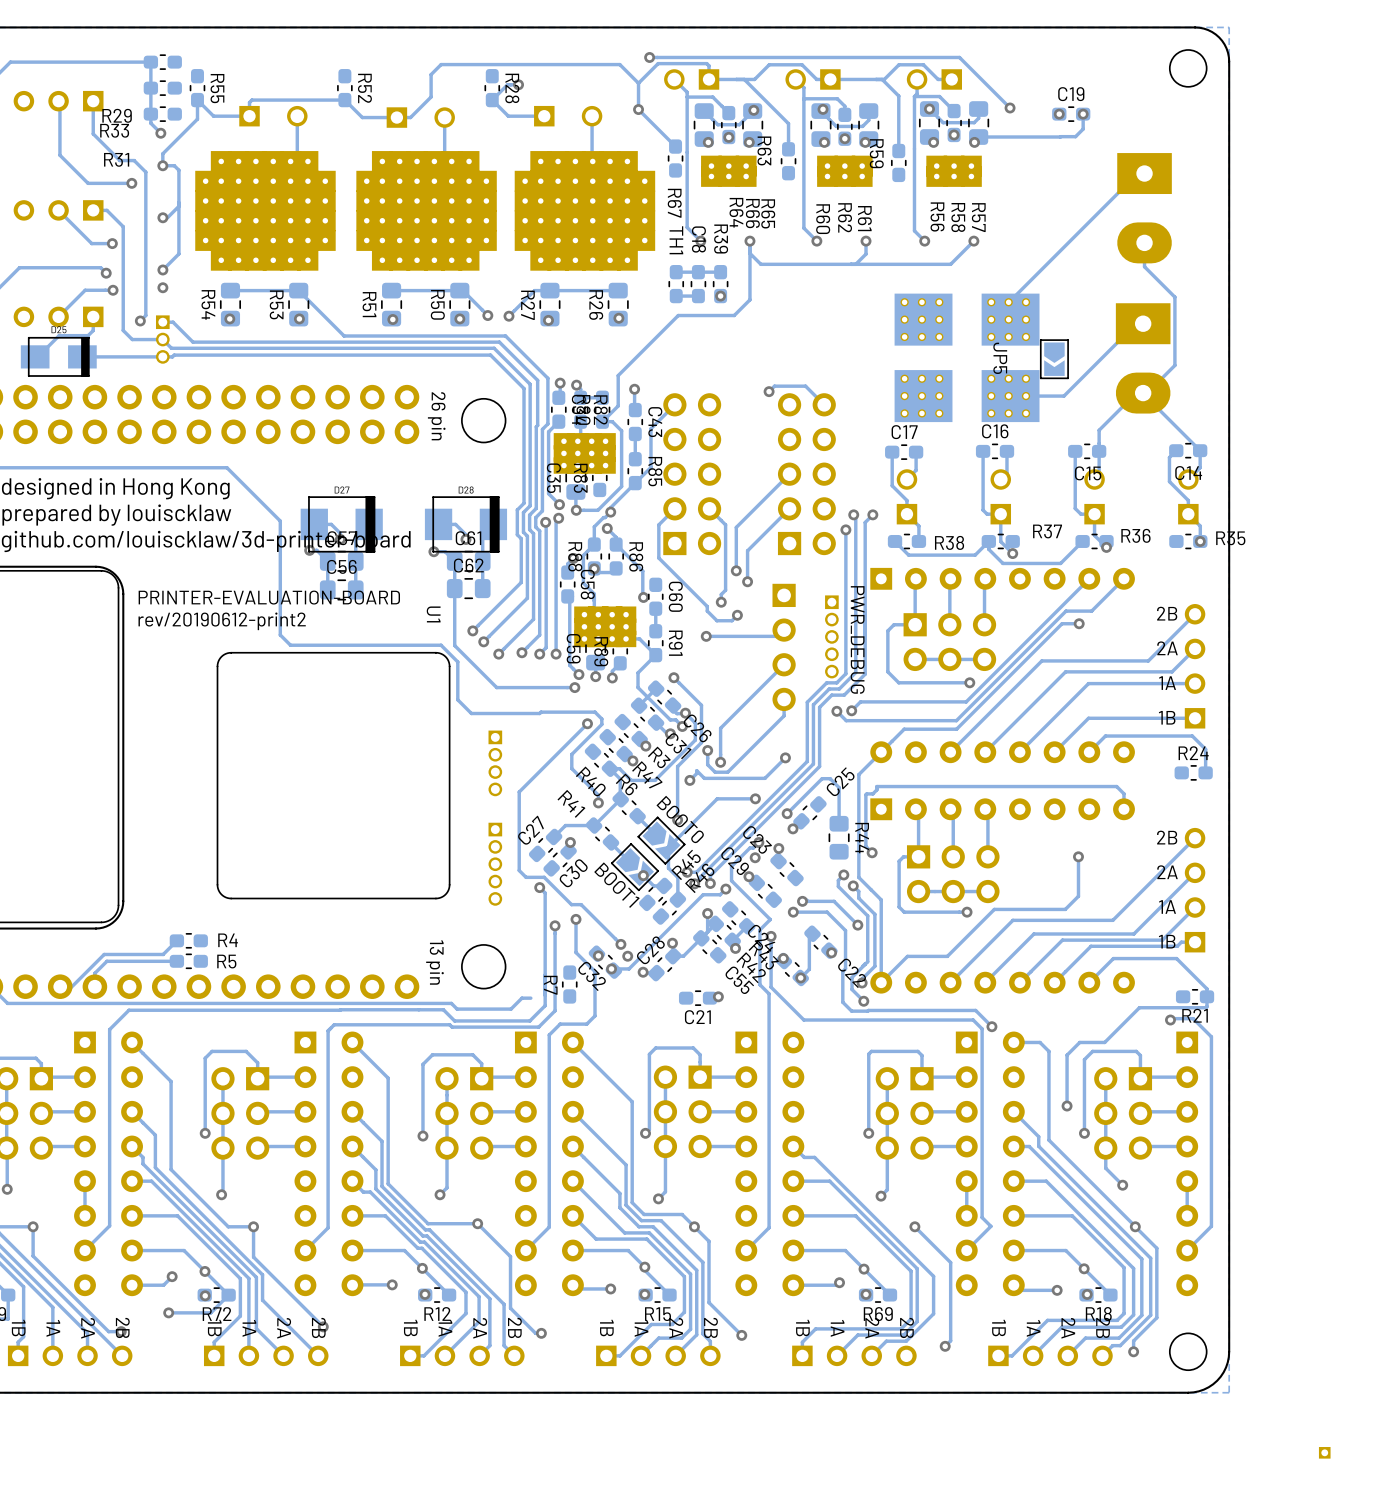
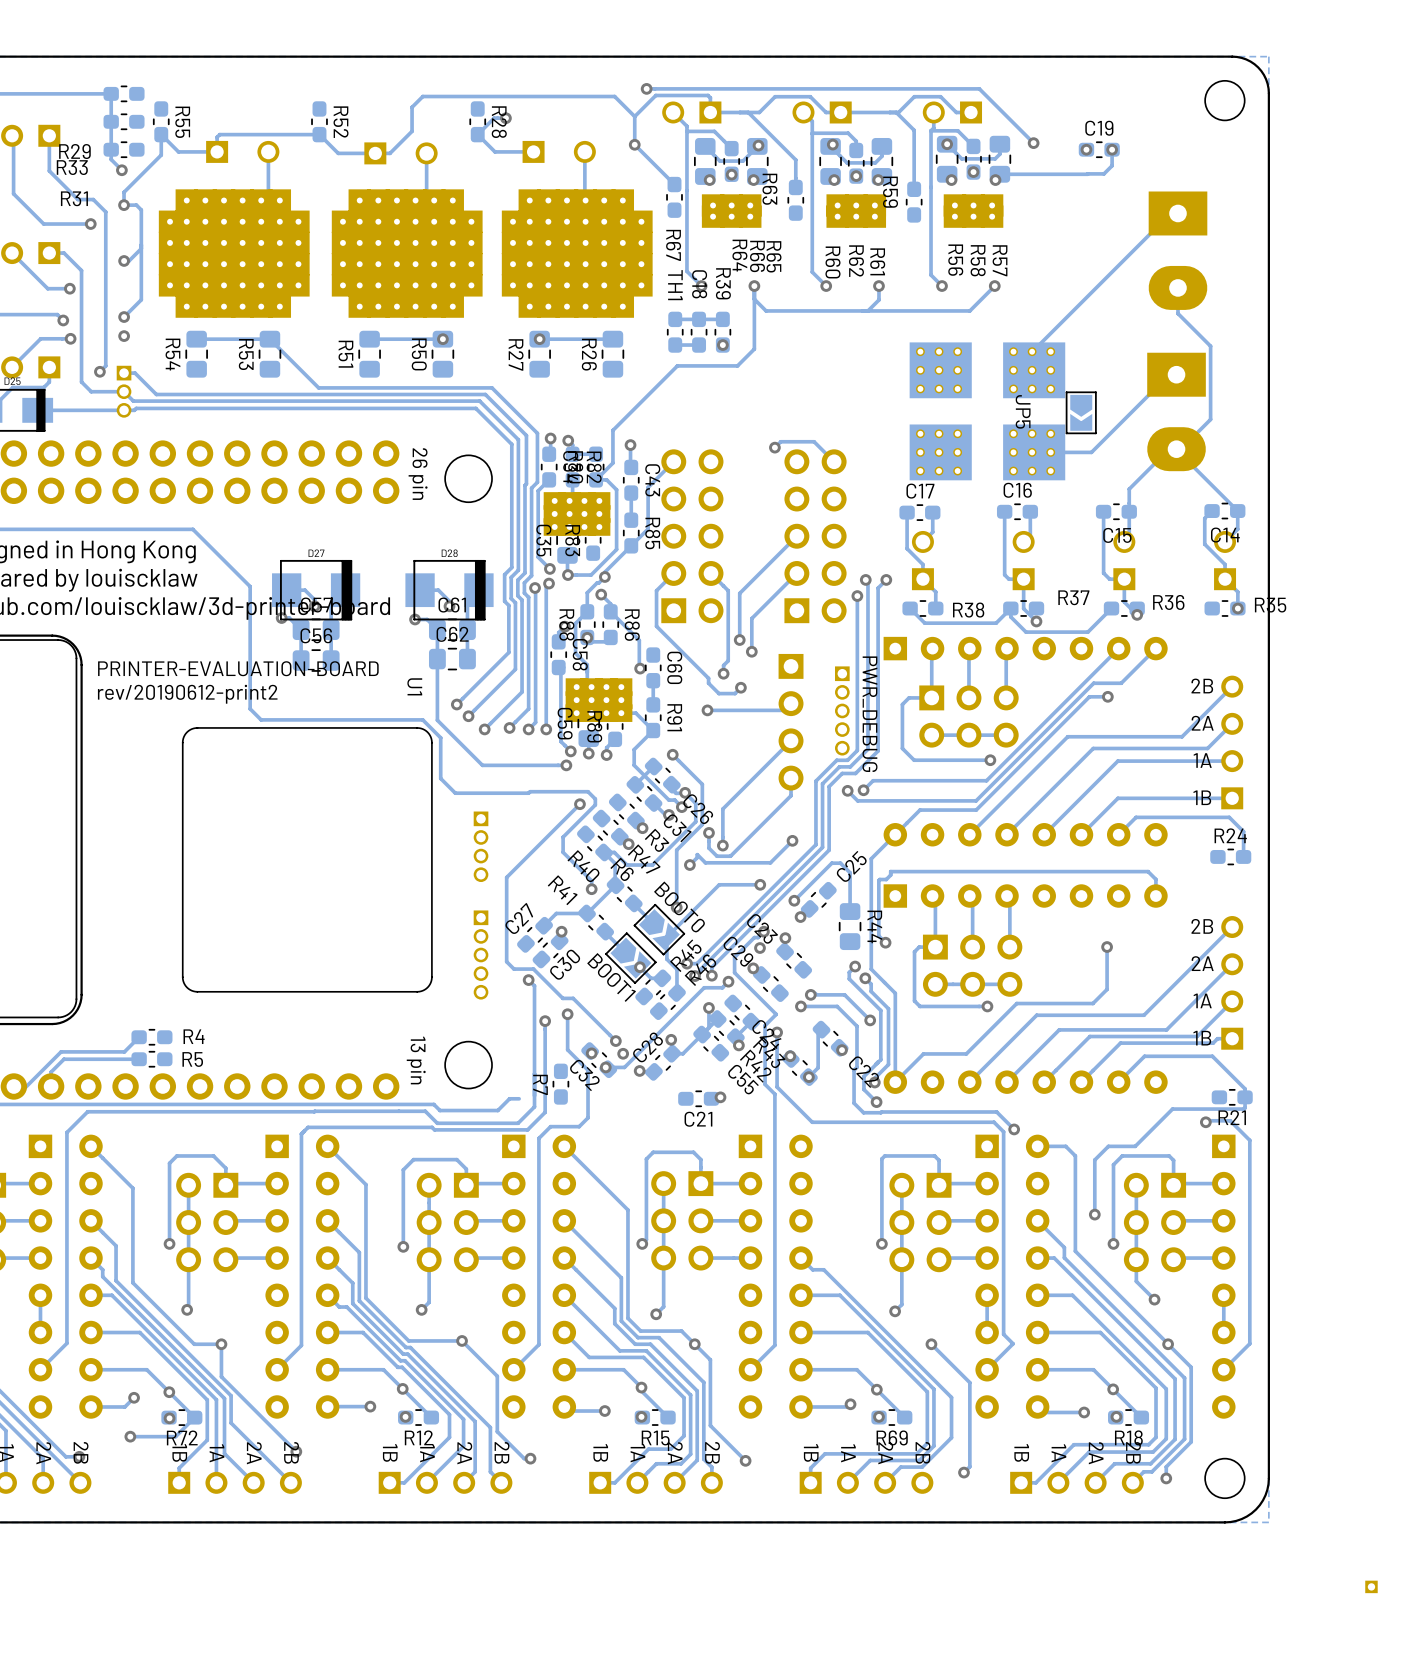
track: (459, 290) (462, 290) (487, 315) -> none
via: none -> (442, 339)
track: (549, 290) (534, 290) (508, 316) -> none
via: none -> (539, 339)
via: (487, 315) -> none
via: (508, 316) -> none
via: (229, 318) -> none
via: (299, 318) -> none
via: (459, 318) -> none
via: (618, 318) -> none
via: (392, 319) -> none
via: (548, 320) -> none

